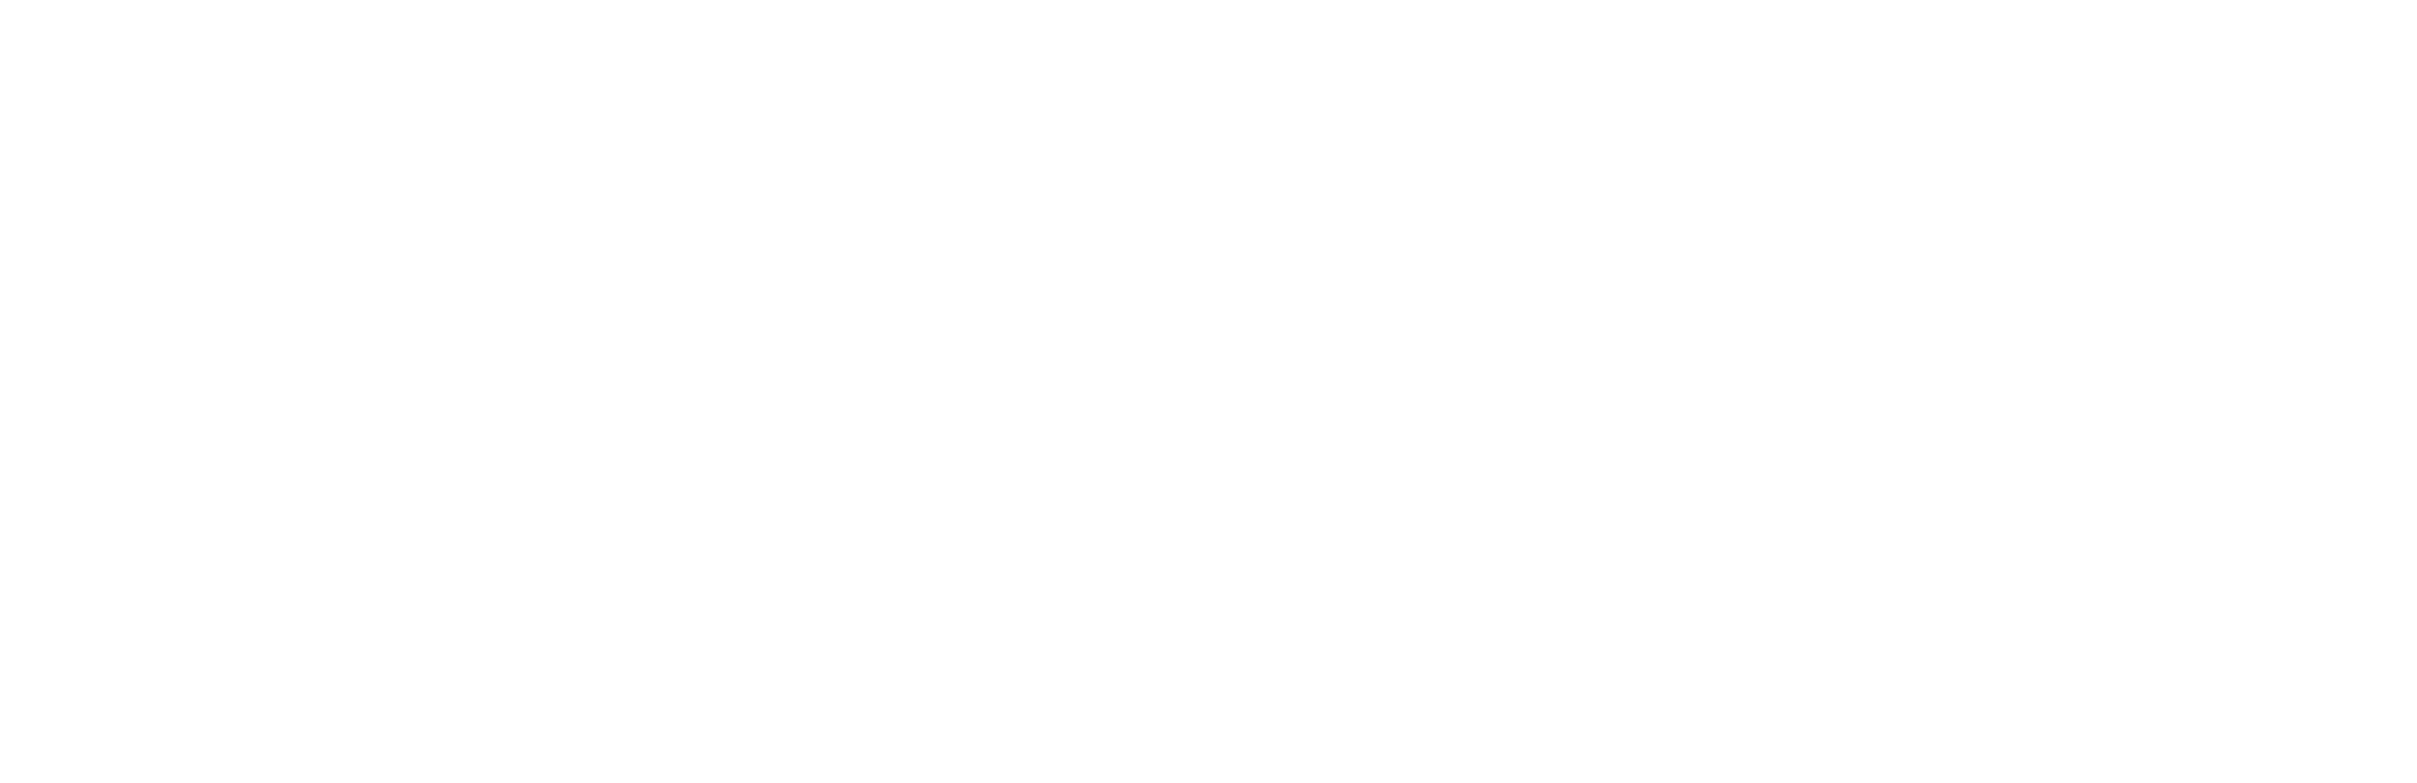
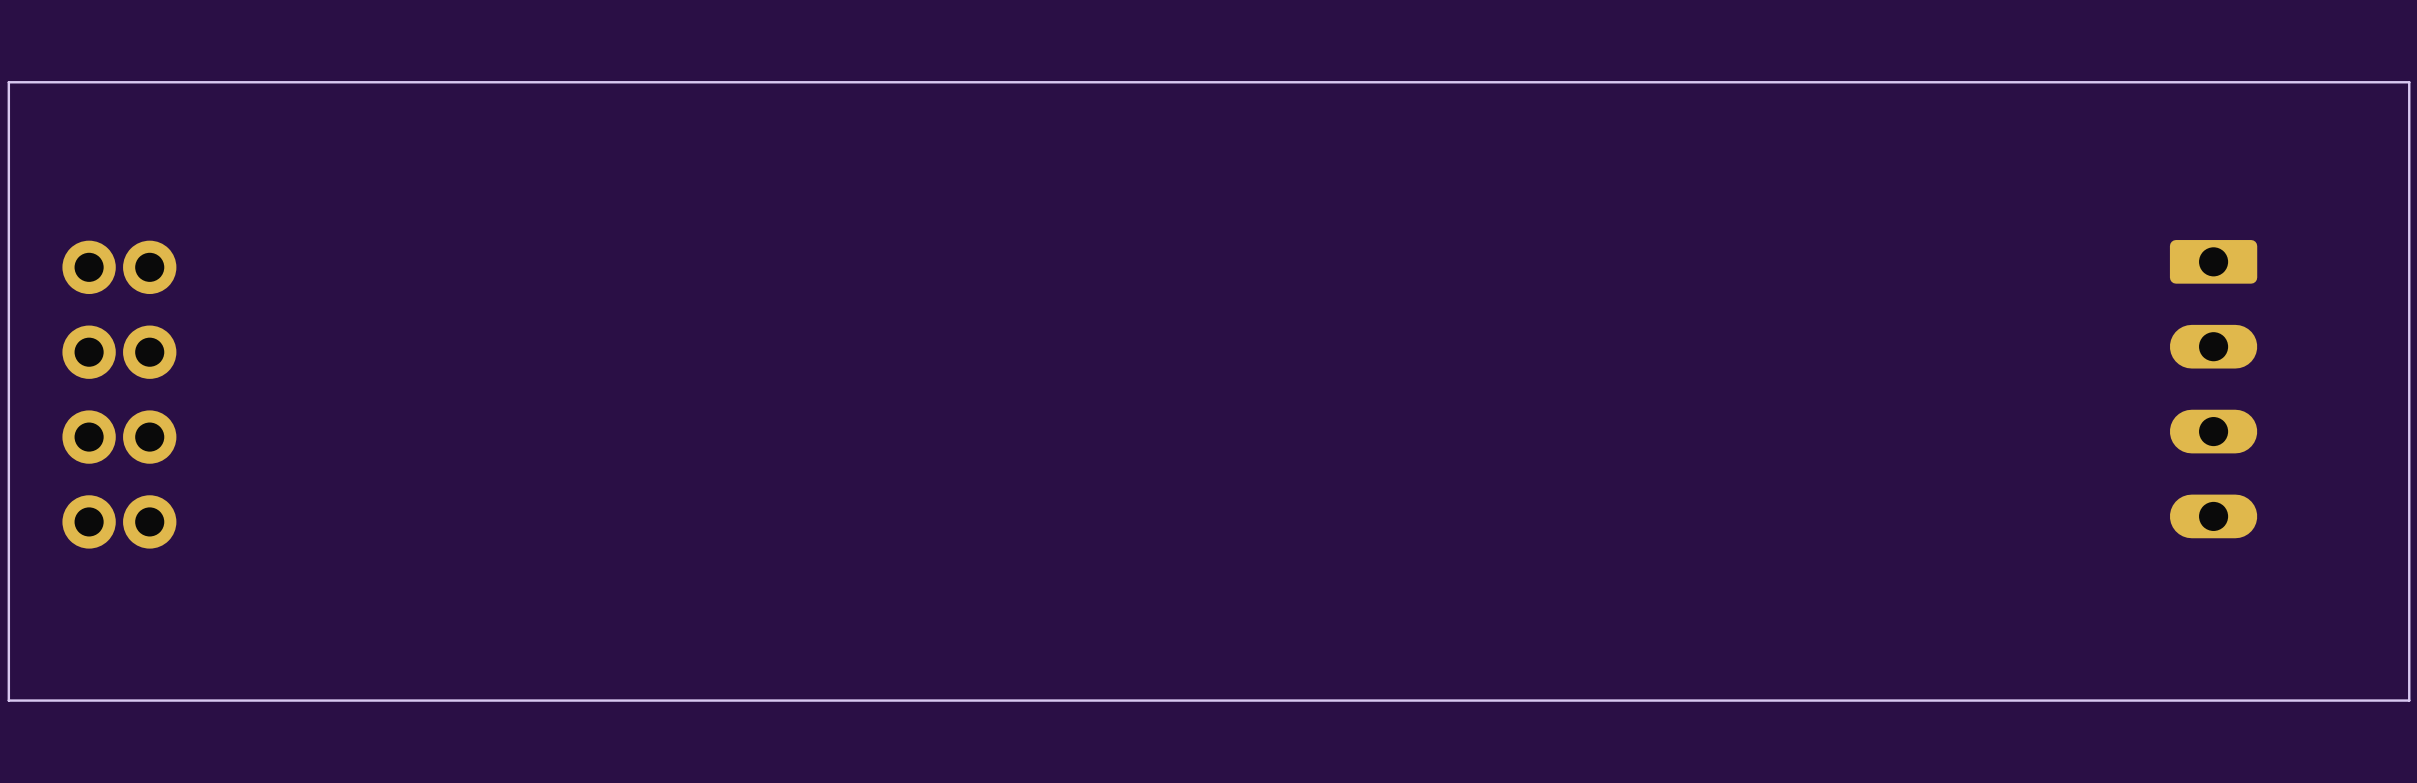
board edge: none -> (2409, 82) (8, 82) (8, 700) (2409, 700) (2409, 82)
part: none -> (2213, 389)
part: none -> (119, 394)

